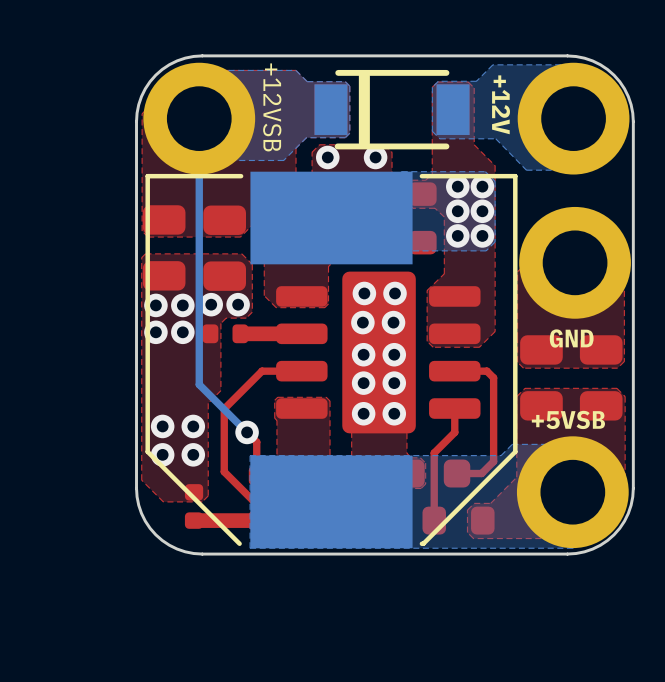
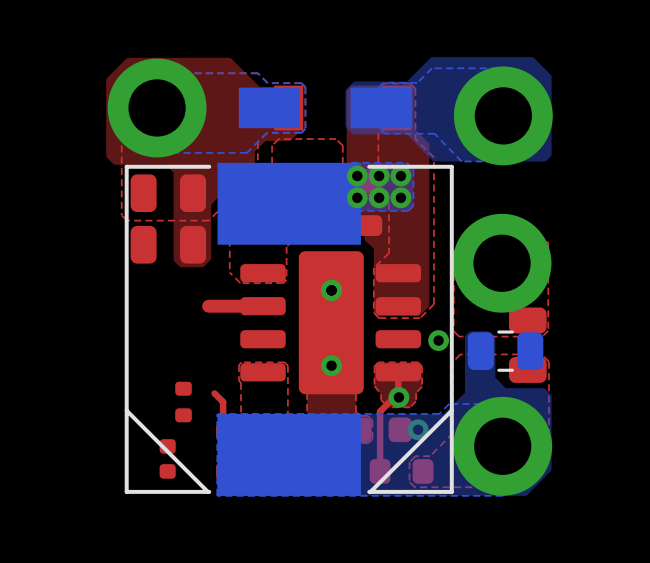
board edge: (567, 55) (202, 55) (177, 60) (162, 69) (150, 81) (138, 104) (136, 121) (136, 488) (138, 505) (145, 521) (162, 540) (185, 551) (202, 554) (567, 554) (584, 551) (600, 545) (619, 528) (631, 505) (633, 488) (632, 113) (624, 88) (614, 75) (592, 60) (567, 55) -> none
text: +12V (501, 104) -> none
text: +12VSB (272, 107) -> none
part: none -> (325, 107)
part: (392, 109) -> none
bottom track: (199, 118) (199, 384) (247, 432) -> none
part position: (199, 118) -> (157, 107)
via: (327, 157) -> none
via: (375, 157) -> none
part footprint: [145, 171, 518, 549] -> [124, 162, 454, 496]
bottom zone outline: (464, 171) (485, 171) (495, 181) (495, 241) (486, 250) (403, 250) (394, 241) (394, 221) -> (406, 162) (413, 169) (413, 205) (408, 211) (348, 211) (344, 207)
via: none -> (357, 176)
via: none -> (379, 176)
via: (482, 186) -> none
part: none -> (168, 193)
via: none -> (357, 197)
via: none -> (379, 197)
via: (482, 211) -> none
via: (457, 235) -> none
via: (482, 235) -> none
part: (164, 247) -> none
part: (224, 248) -> none
top zone outline: (241, 253) (145, 253) (141, 257) (141, 480) (163, 501) (202, 501) (208, 495) (208, 403) (220, 390) (220, 323) (226, 318) (246, 318) (252, 312) (252, 264) (241, 253) -> none
part position: (575, 262) -> (502, 263)
part: none -> (168, 244)
via: (364, 293) -> none
via: (395, 293) -> none
via: (211, 304) -> none
via: (238, 304) -> none
via: (155, 305) -> none
via: (182, 305) -> none
via: none -> (331, 290)
via: (362, 322) -> none
via: (393, 322) -> none
via: (155, 332) -> none
via: (182, 332) -> none
part rotation: 0° (225, 333) -> 90° clockwise (183, 402)
part position: (225, 333) -> (183, 402)
text: GND (571, 338) -> none
via: (363, 354) -> none
via: (394, 354) -> none
top track: (301, 371) (262, 371) (224, 408) (224, 471) (252, 500) (279, 500) (286, 507) (286, 520) (321, 520) -> none
top track: (454, 371) (486, 371) (493, 377) (493, 461) (481, 473) (477, 473) -> none
via: none -> (438, 340)
part side: top (541, 377) -> bottom (505, 351)
via: (363, 383) -> none
via: (394, 383) -> none
top zone outline: none -> (418, 362) (422, 366) (422, 386) (416, 392) (416, 401) (410, 407) (388, 407) (381, 400) (381, 394) (374, 386) (374, 366) (378, 362) (418, 362)
via: none -> (331, 365)
via: (363, 413) -> none
via: (394, 413) -> none
text: +5VSB (568, 419) -> none
via: (162, 426) -> none
via: (193, 426) -> none
via: (247, 432) -> none
via: none -> (398, 397)
via: (162, 454) -> none
via: (193, 454) -> none
via: none -> (418, 429)
top track: (256, 520) (194, 520) -> none

